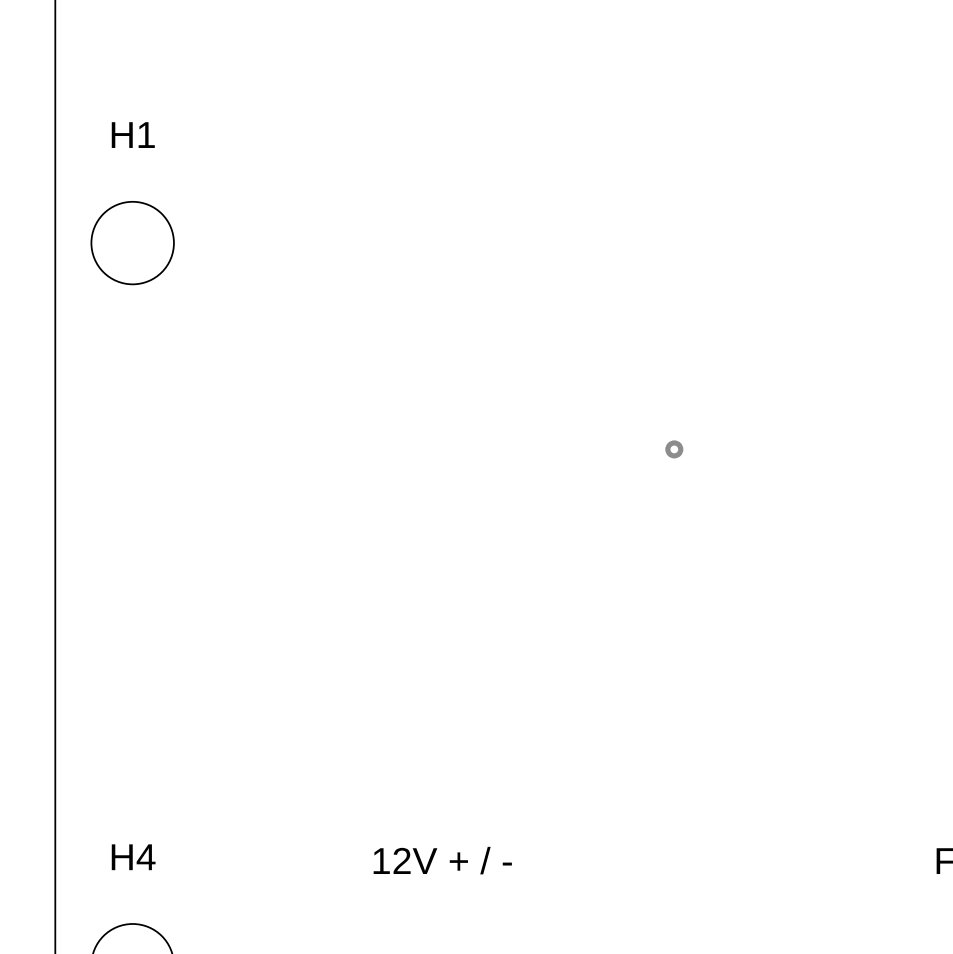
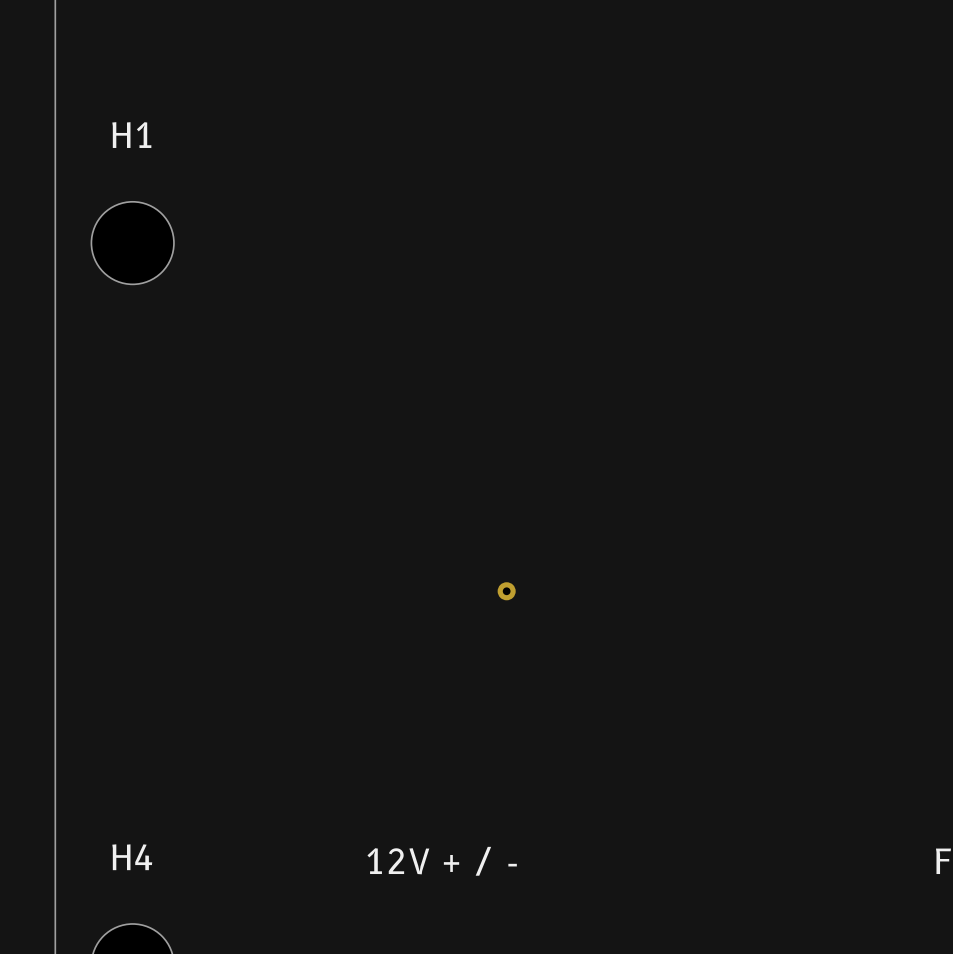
via: (674, 449) -> none
via: none -> (506, 591)

